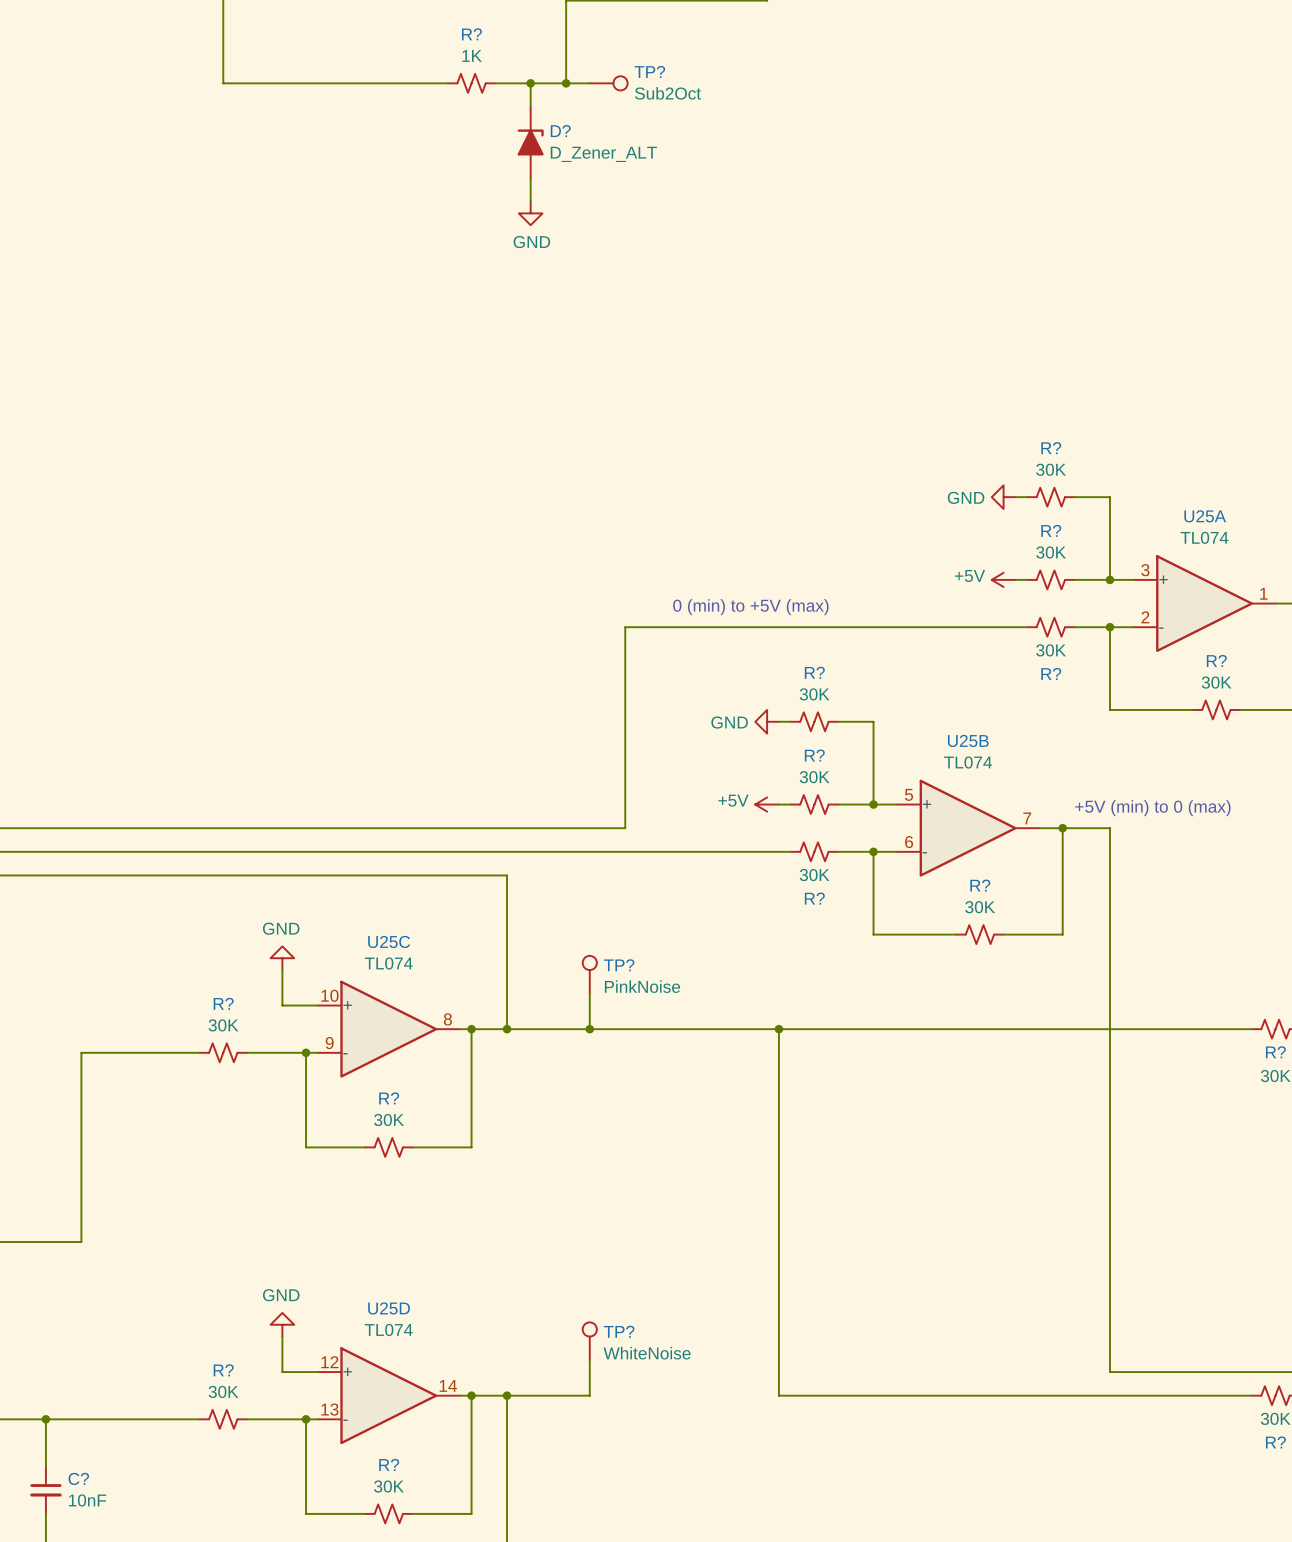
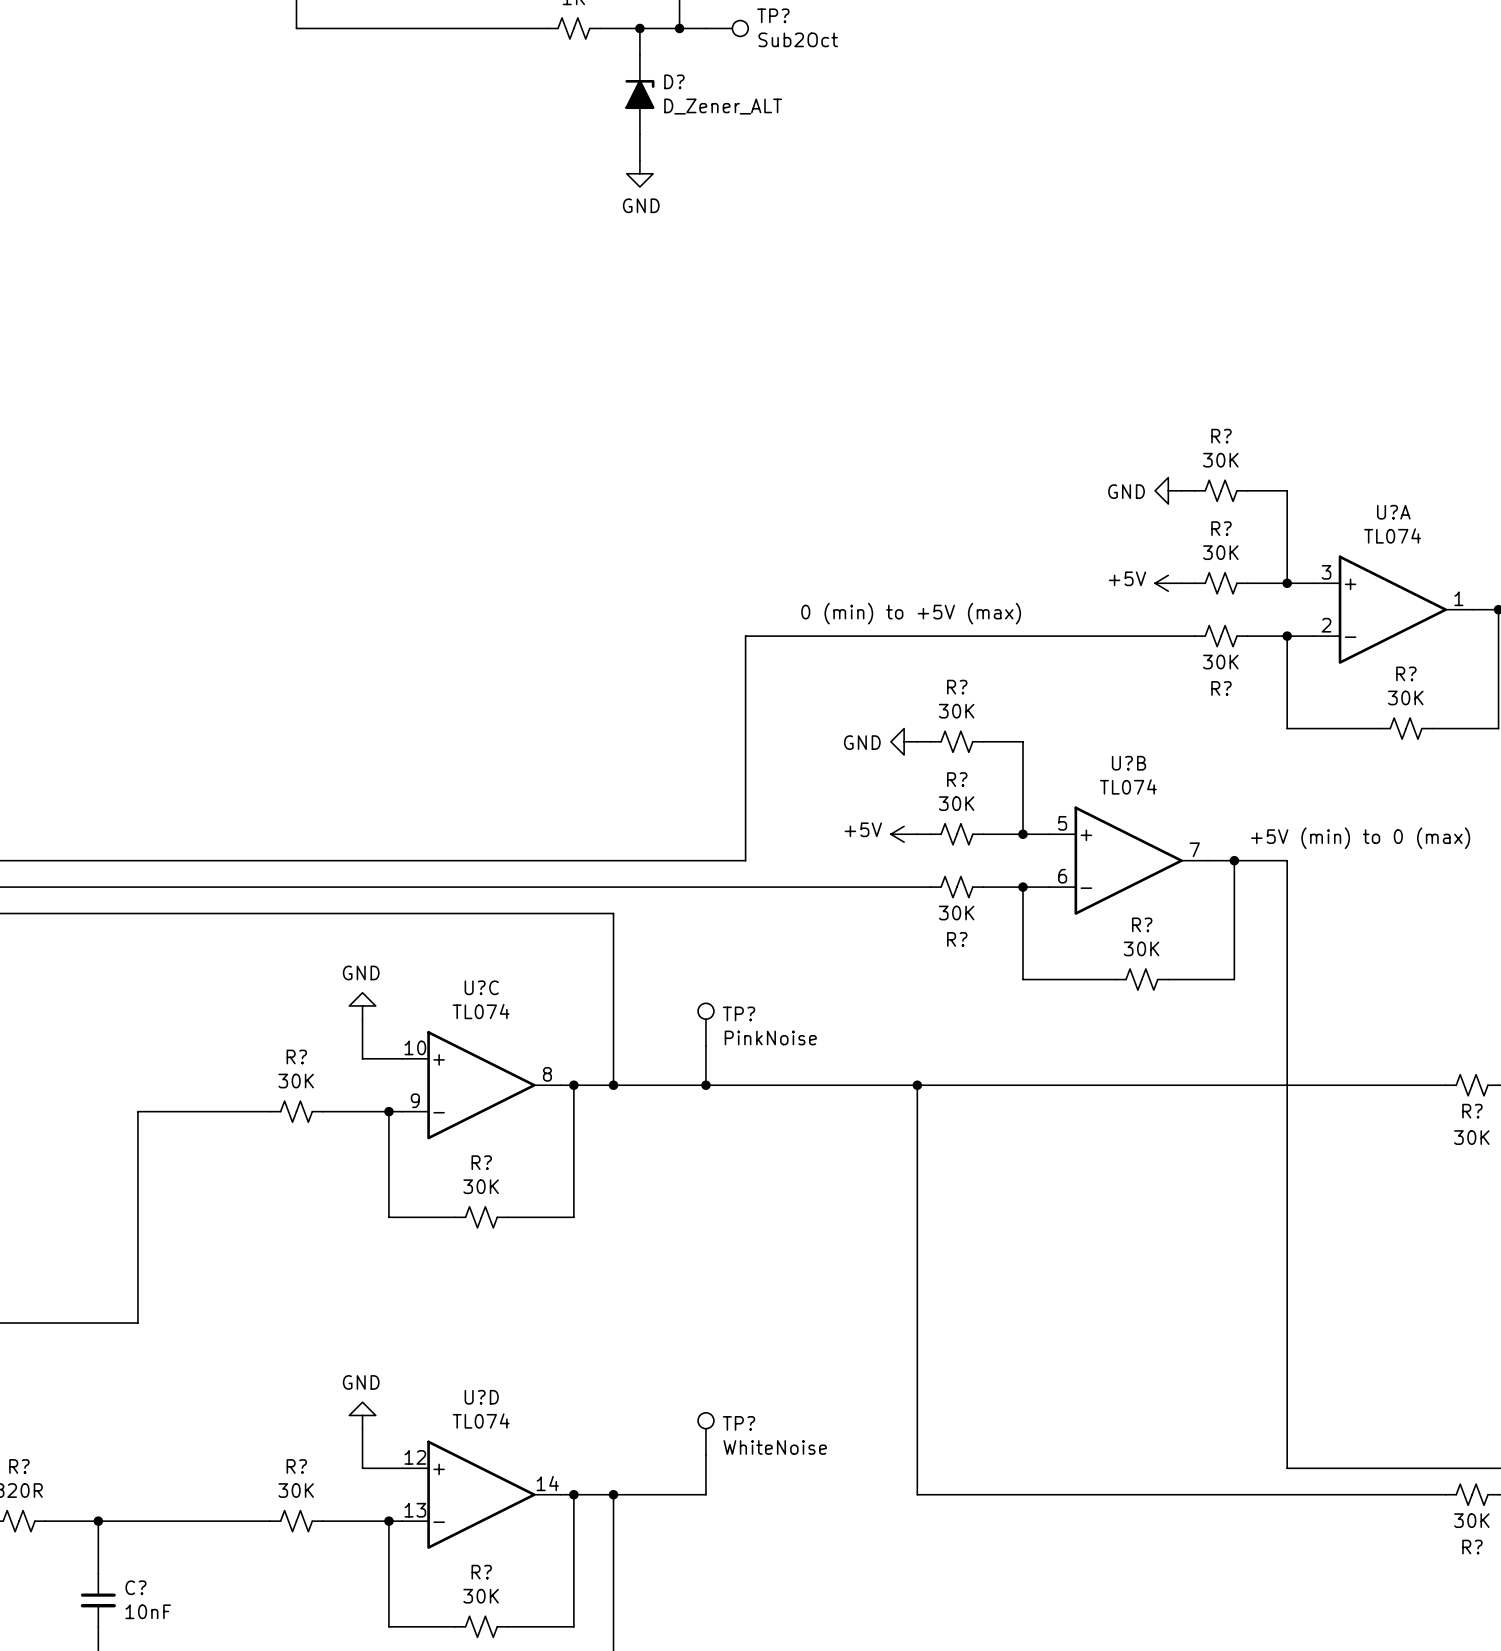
U25A name: U25A (1205, 516) -> U?A (1393, 512)
U25B name: U25B (968, 740) -> U?B (1128, 763)
U25C name: U25C (389, 941) -> U?C (481, 987)
U25D name: U25D (389, 1308) -> U?D (481, 1397)

